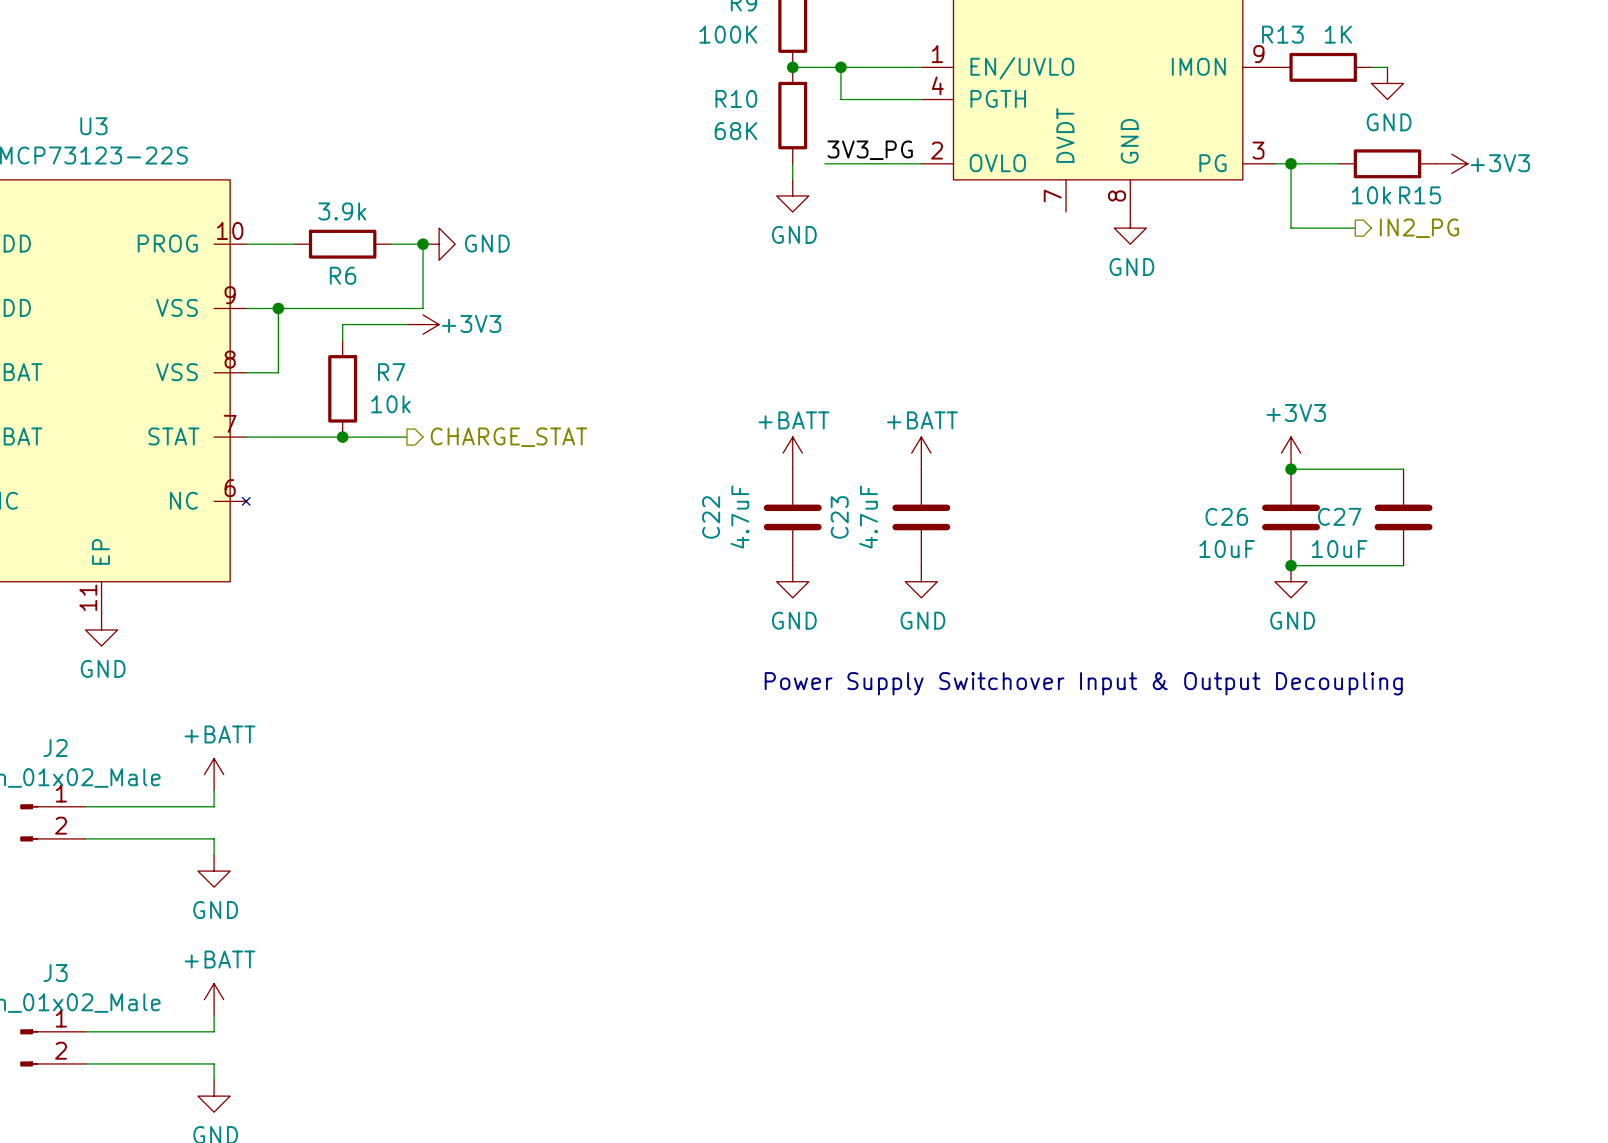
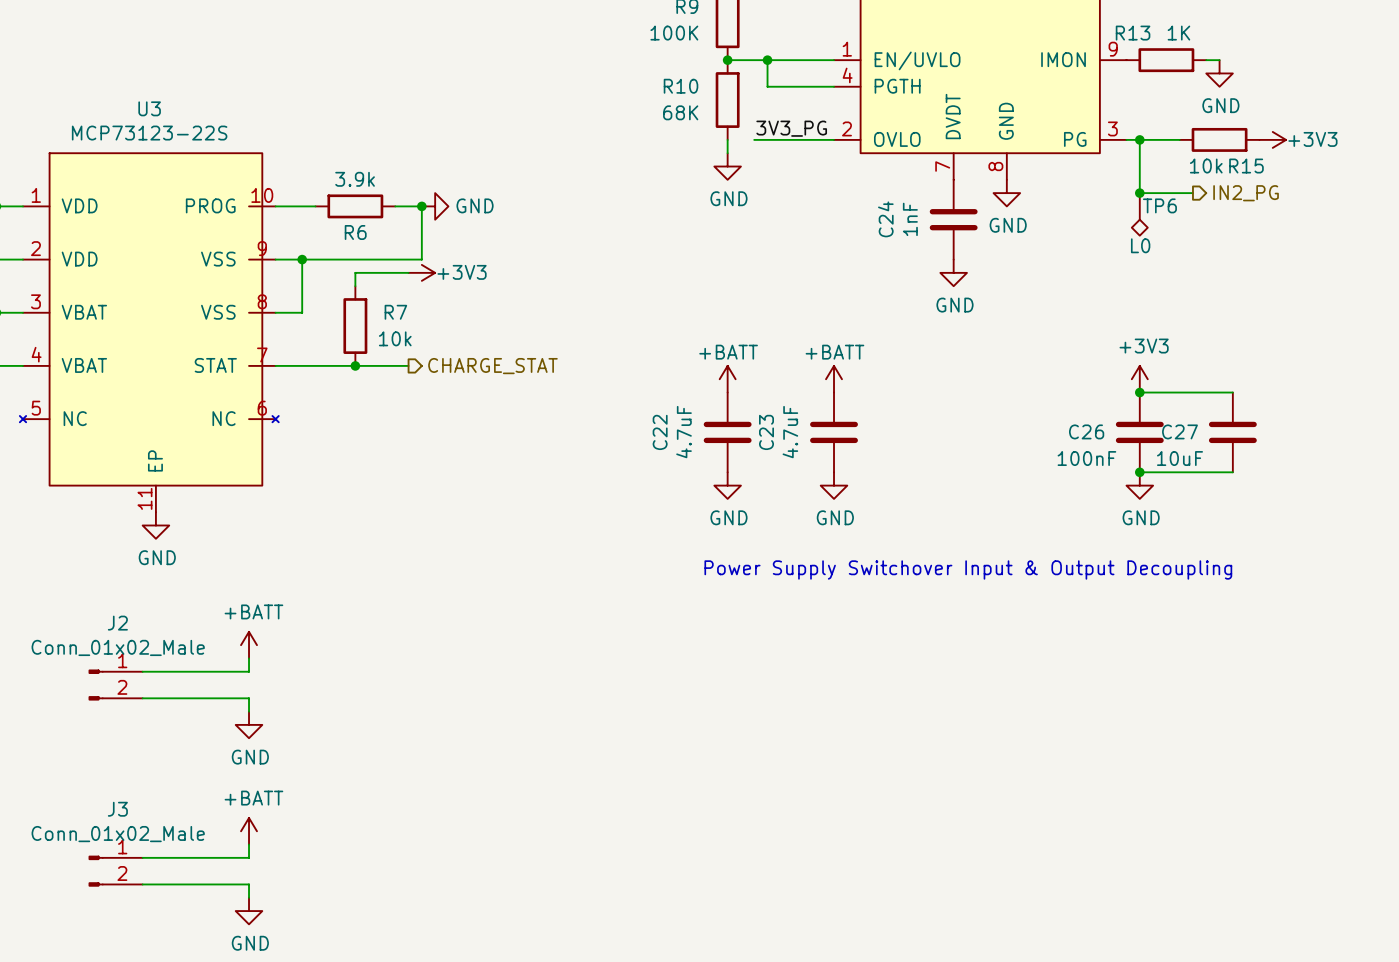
junction: none -> (1139, 193)
TP6: none -> L0 (1139, 214)
C24: none -> 1nF (953, 219)
power symbol: none -> GND (953, 272)
C26 value: 10uF (1227, 548) -> 100nF (1086, 458)

